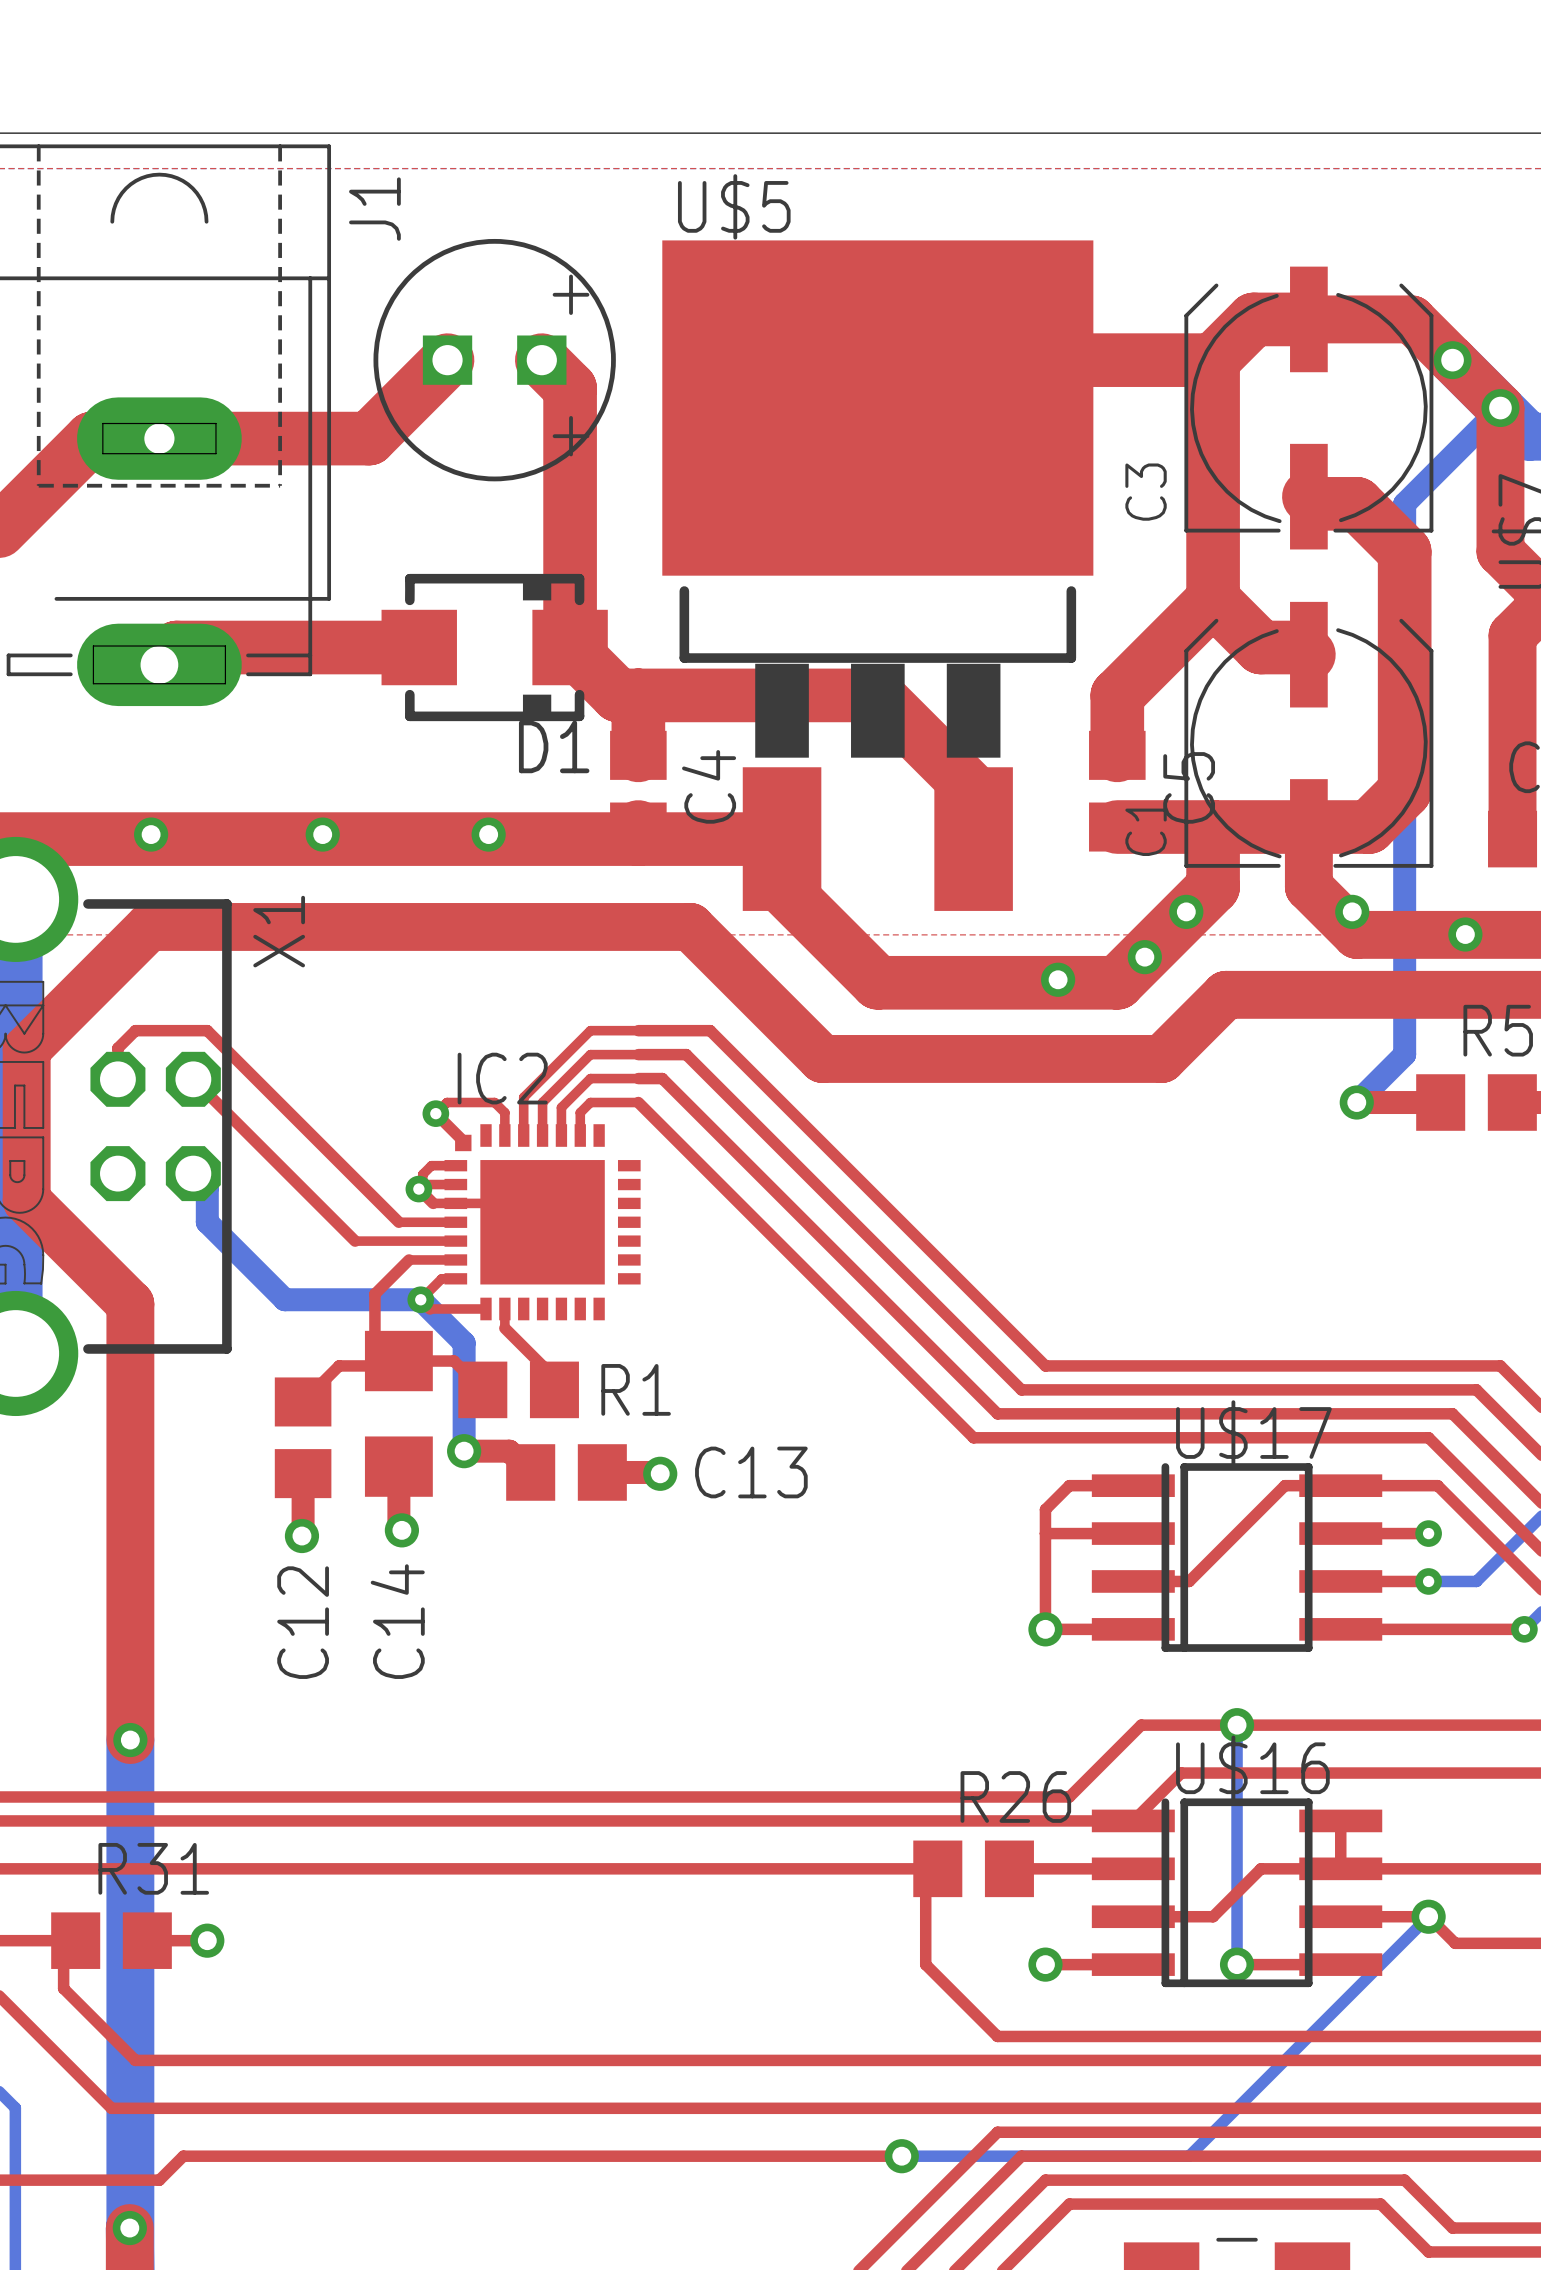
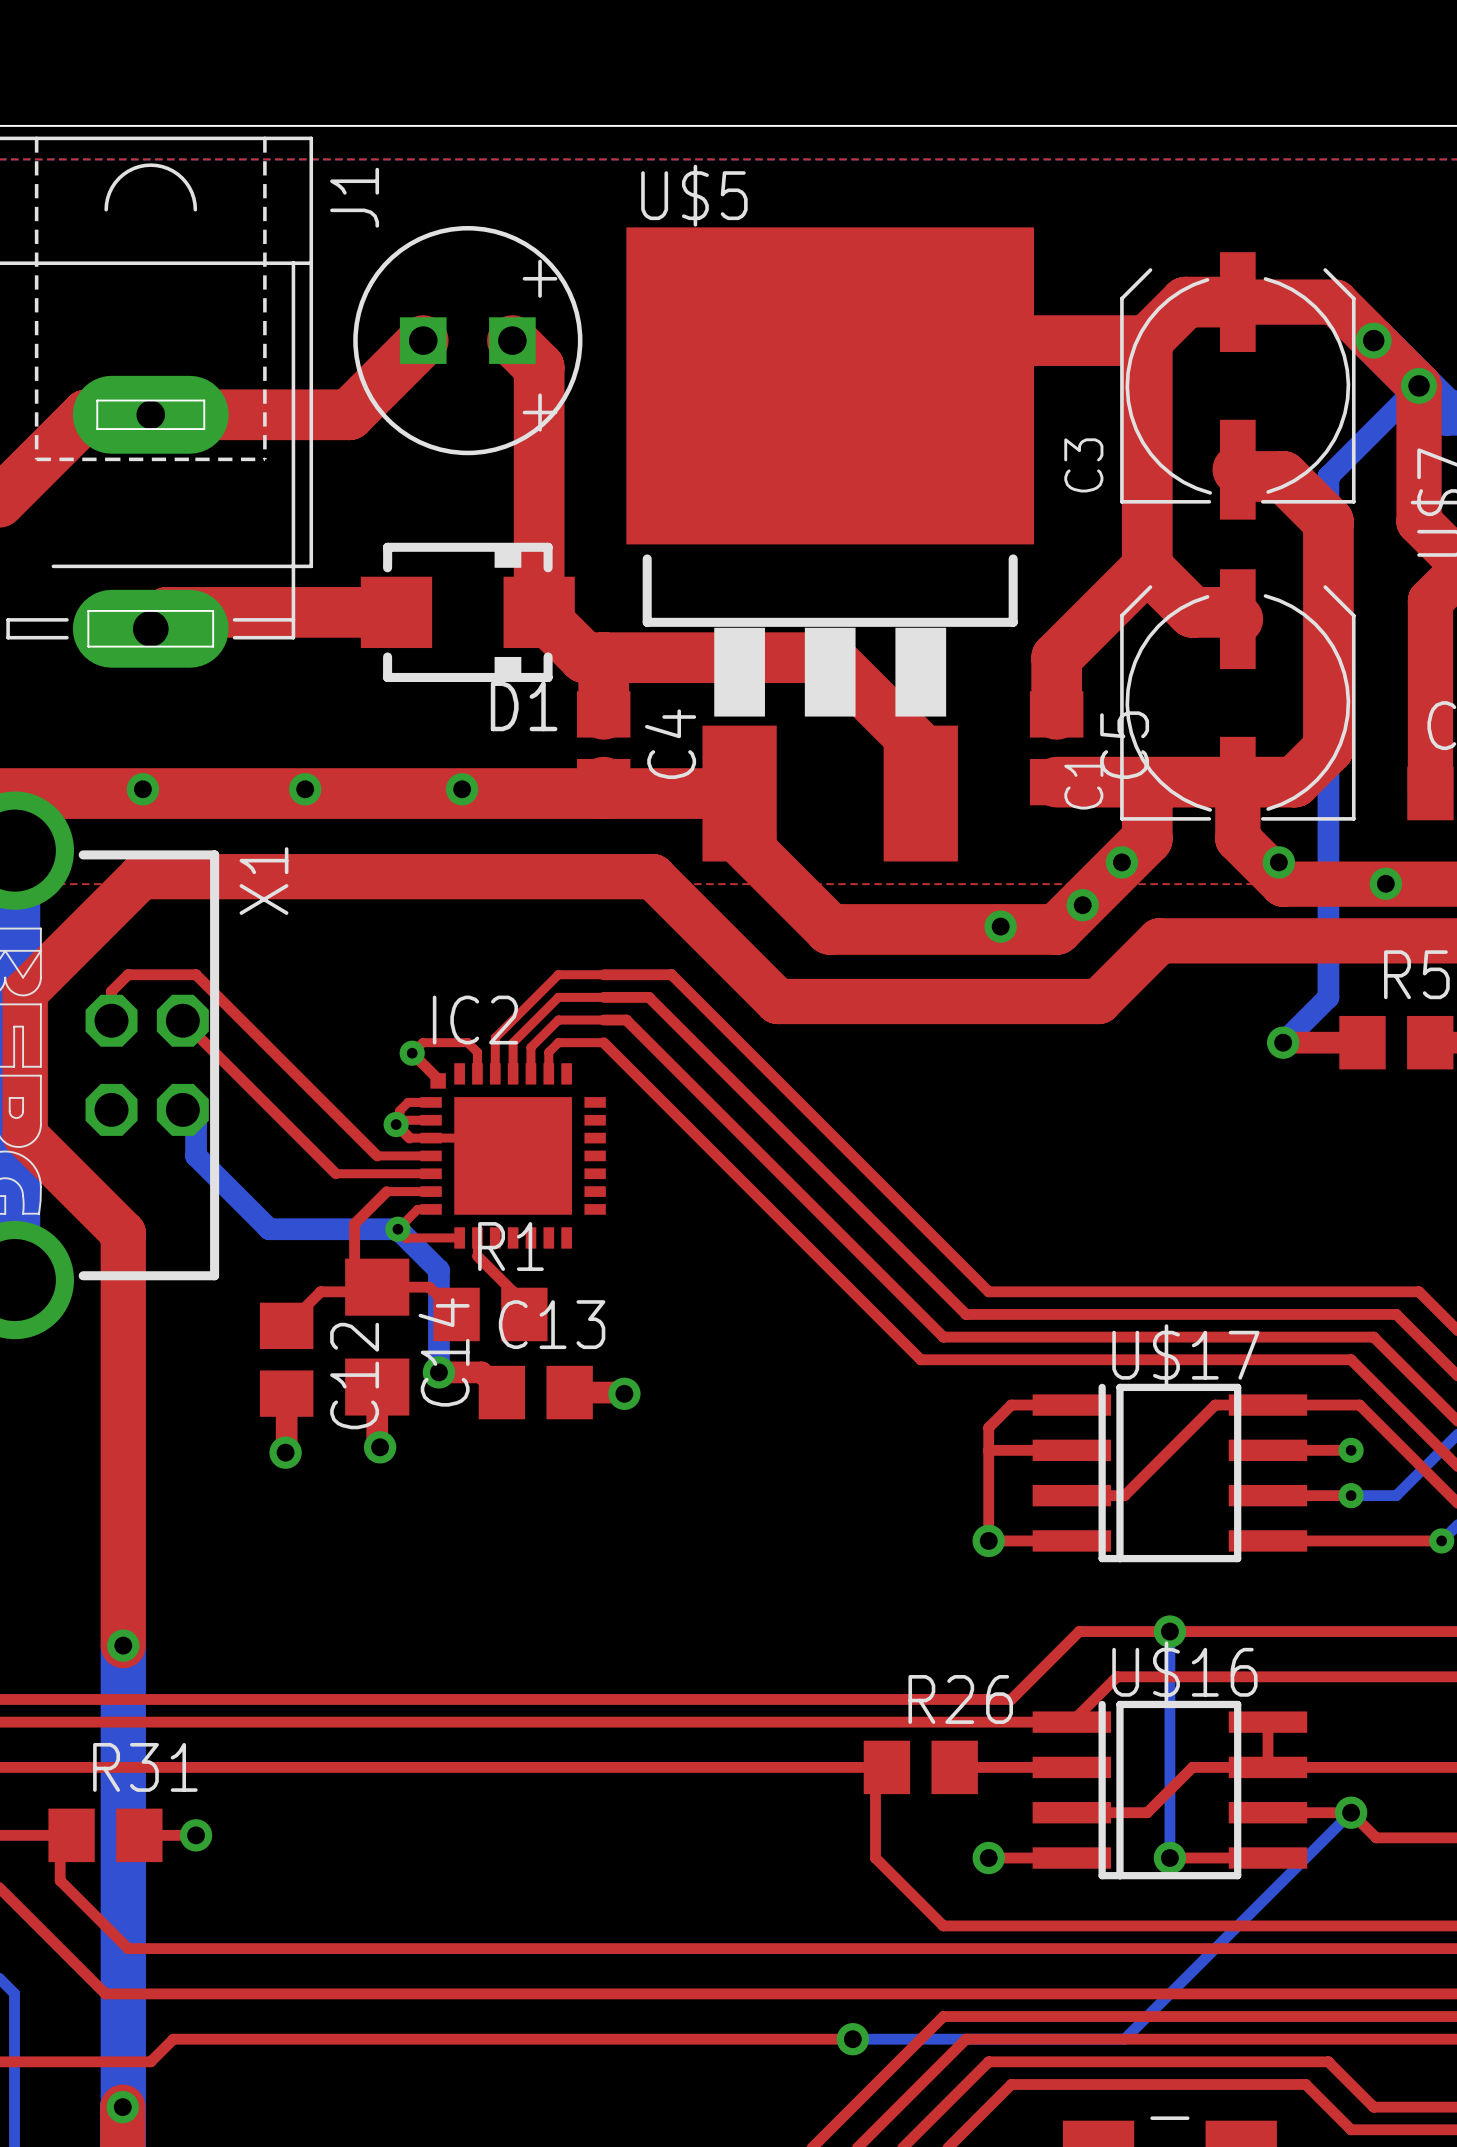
R1 name position: R1 (636, 1389) -> R1 (510, 1246)
C13 name position: C13 (751, 1472) -> C13 (552, 1324)
C14 name position: C14 (397, 1621) -> C14 (444, 1352)
C12 name position: C12 (303, 1622) -> C12 (354, 1376)

